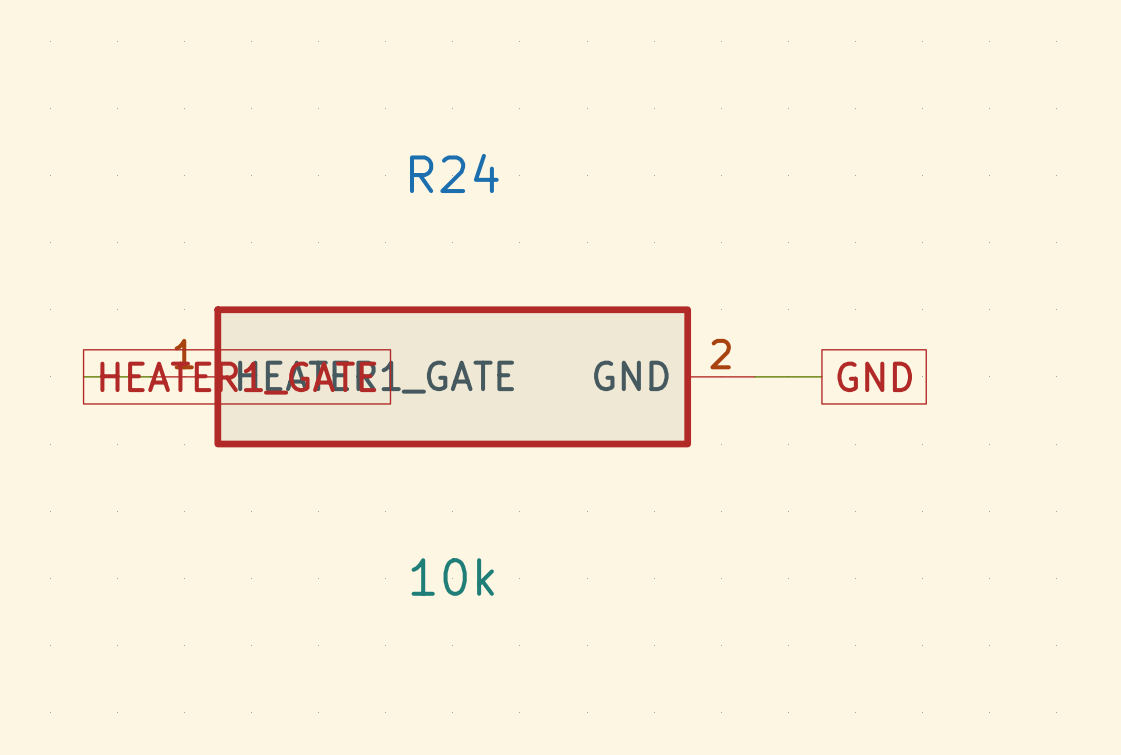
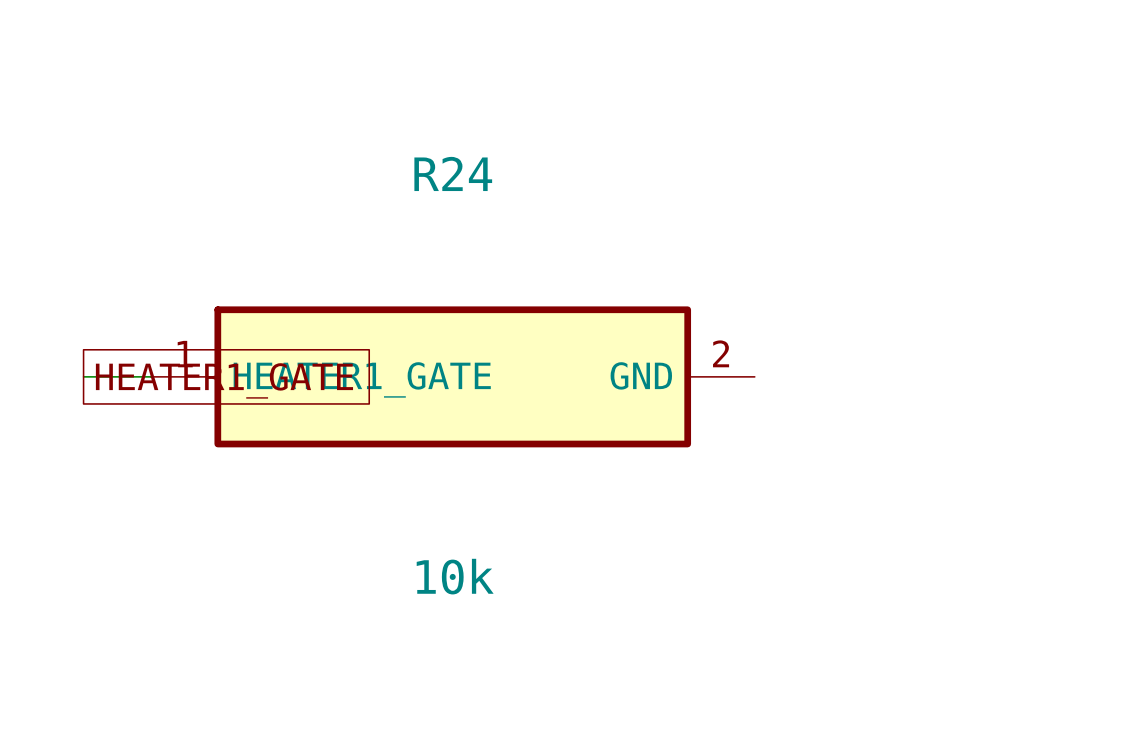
wire: (754, 376) (821, 376) -> none
global label: GND (874, 376) -> none

